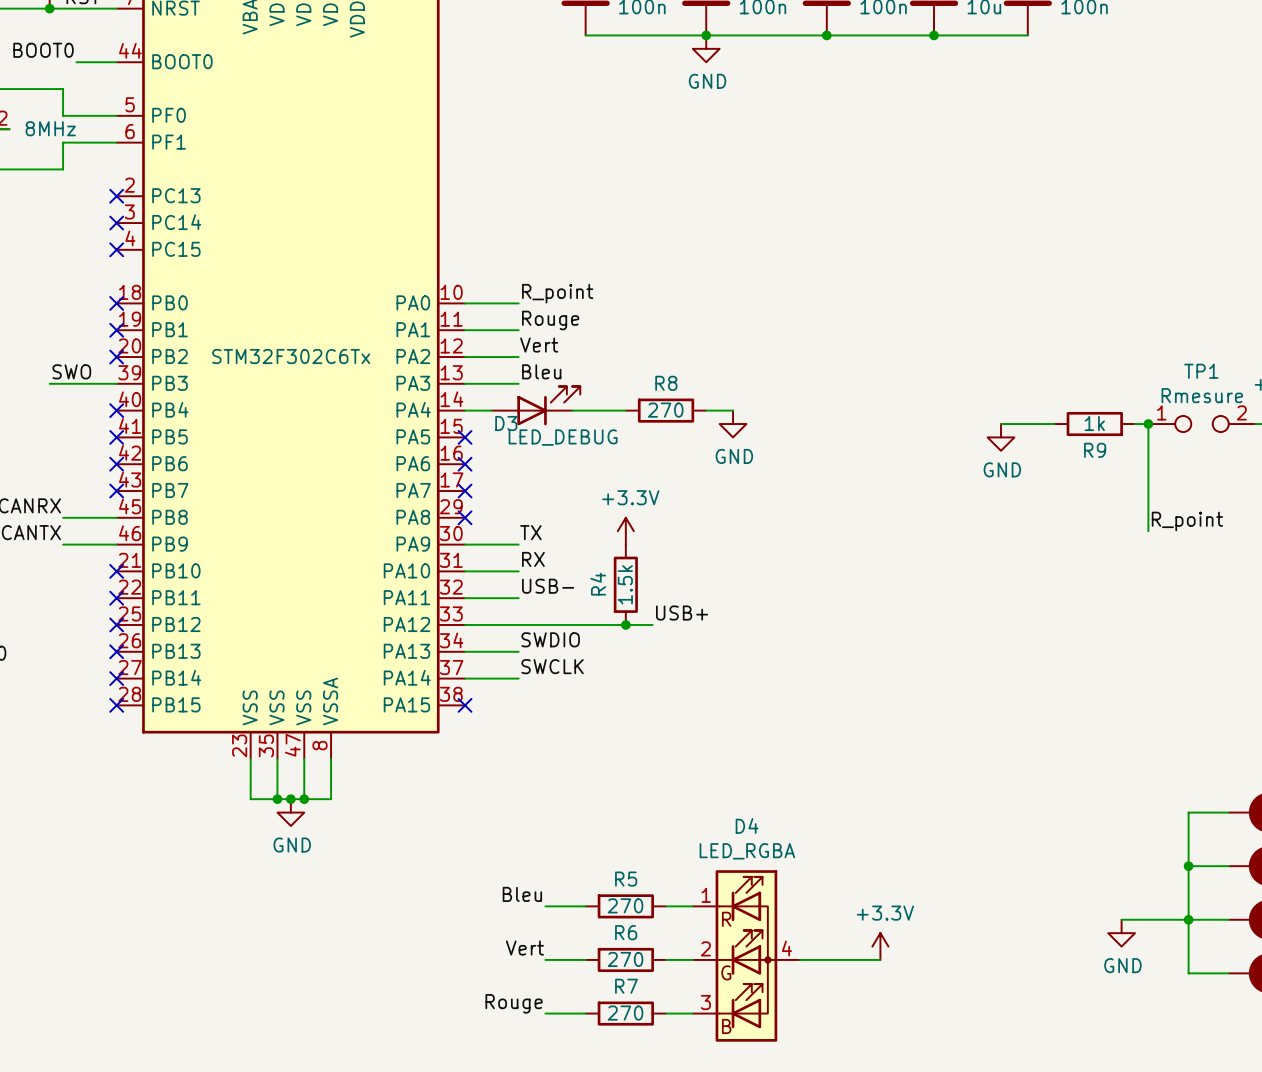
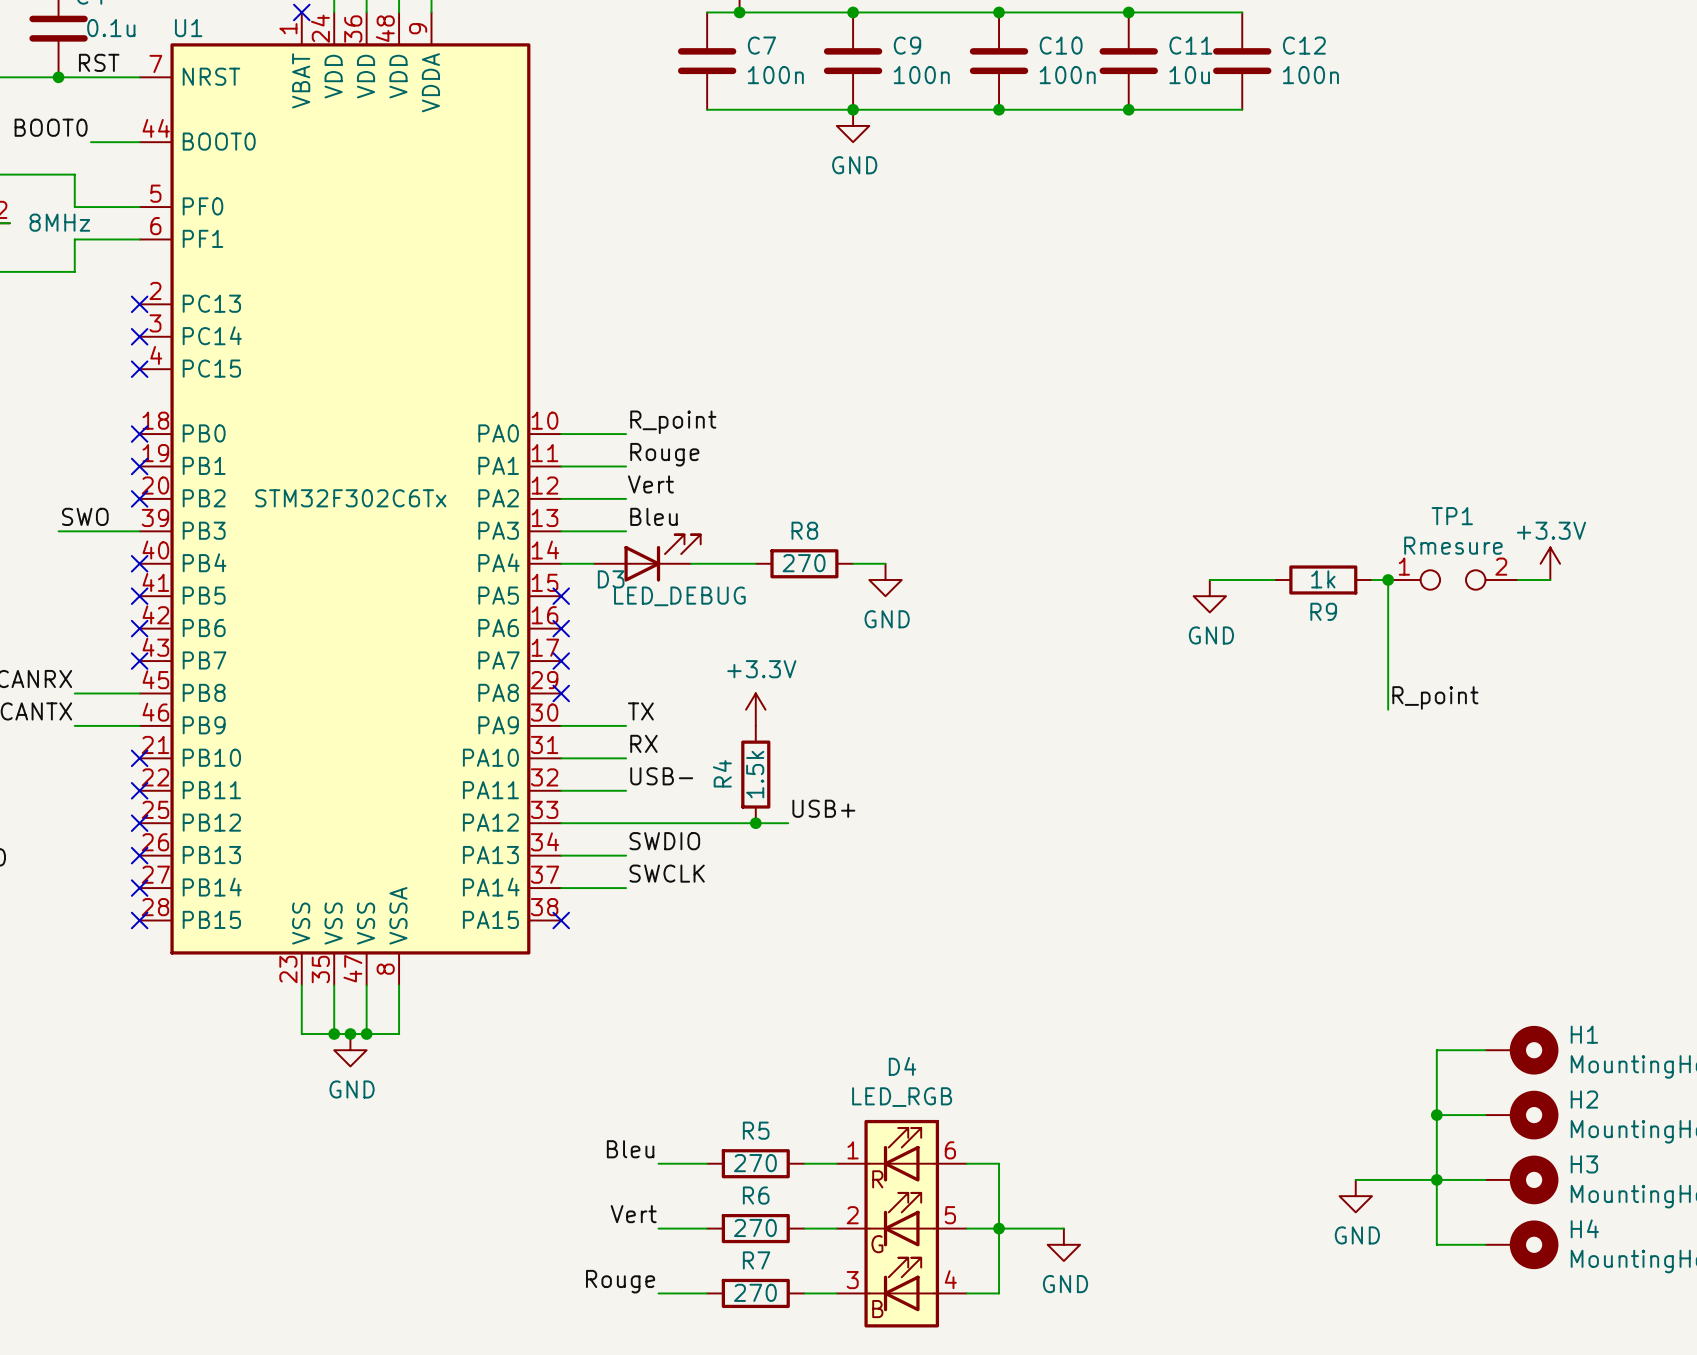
D4 value: LED_RGBA (747, 851) -> LED_RGB (902, 1097)
D4 symbol: [692, 870, 801, 1042] -> [836, 1119, 967, 1328]
wire: none -> (966, 1163) (999, 1163) (999, 1293) (966, 1293)
power symbol: +3.3V (880, 946) -> none
junction: none -> (999, 1228)
power symbol: none -> GND (1063, 1244)

